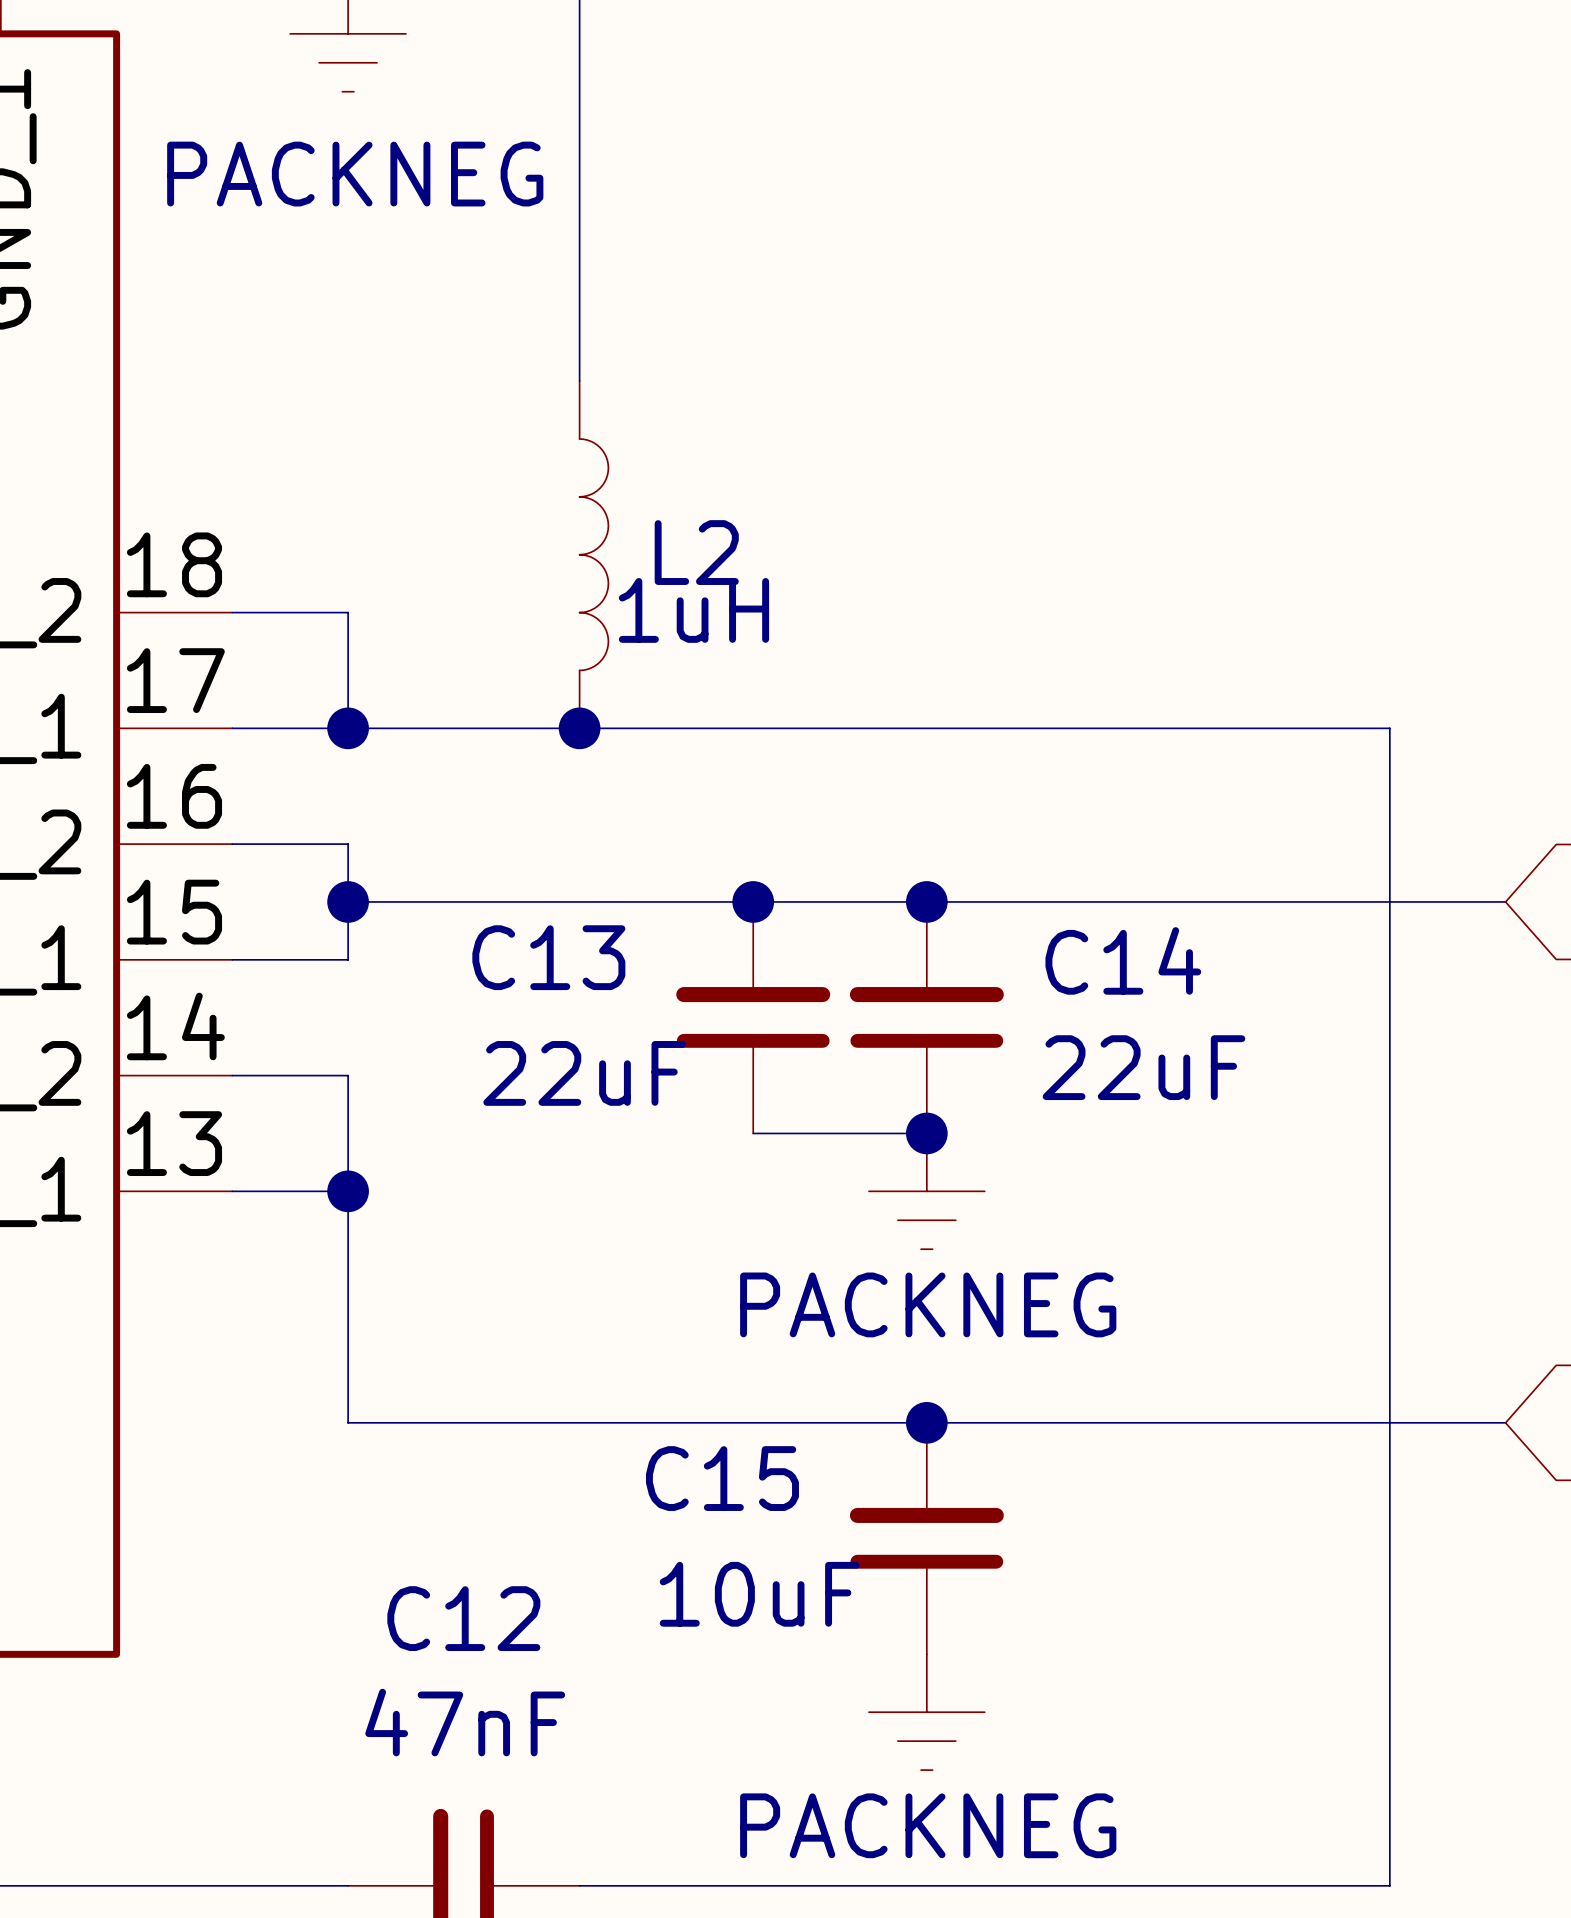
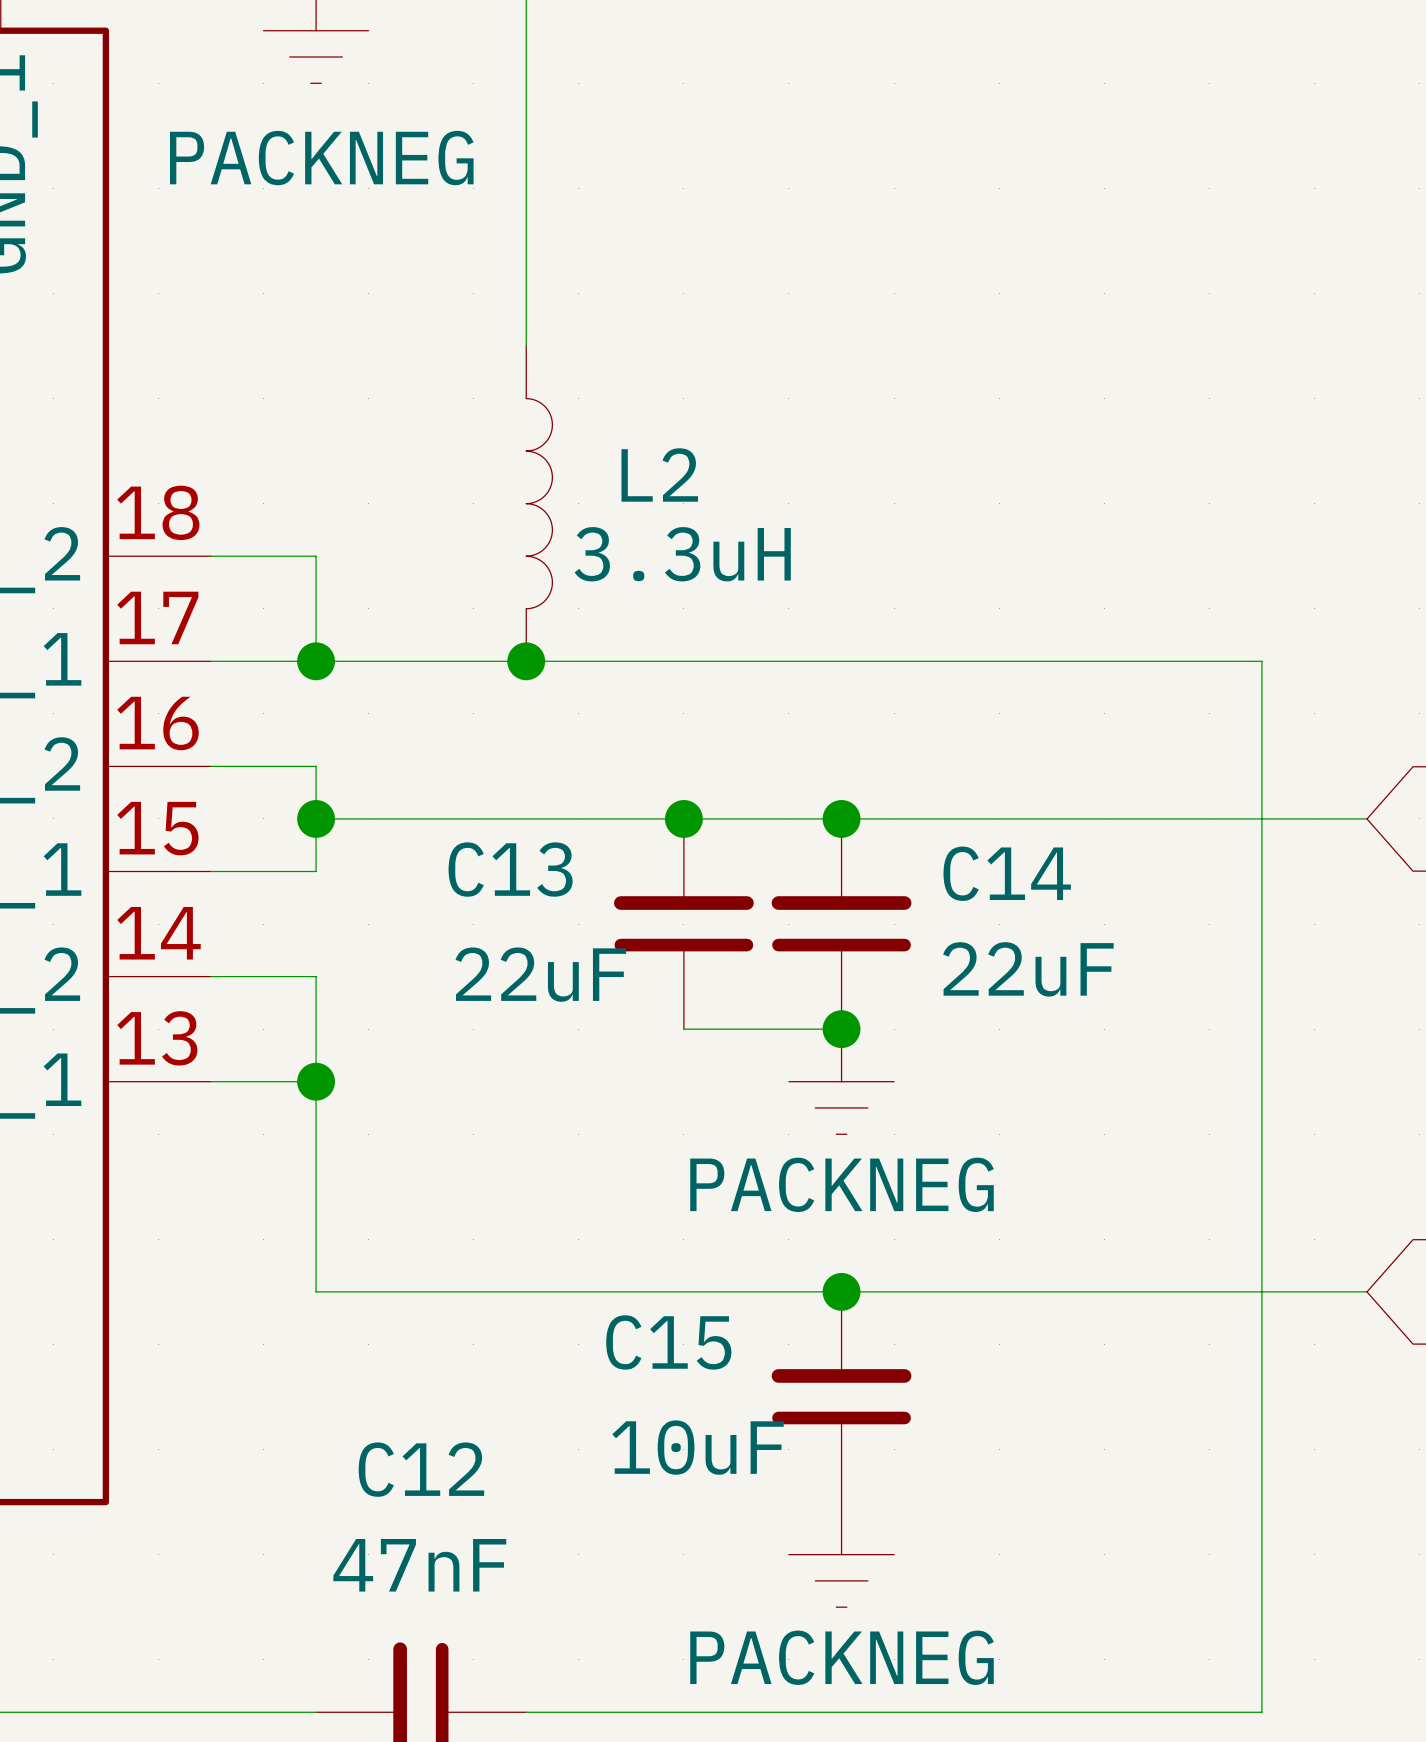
L2 name position: L2 (696, 552) -> L2 (659, 474)
L2 value: 1uH (693, 610) -> 3.3uH (682, 554)

